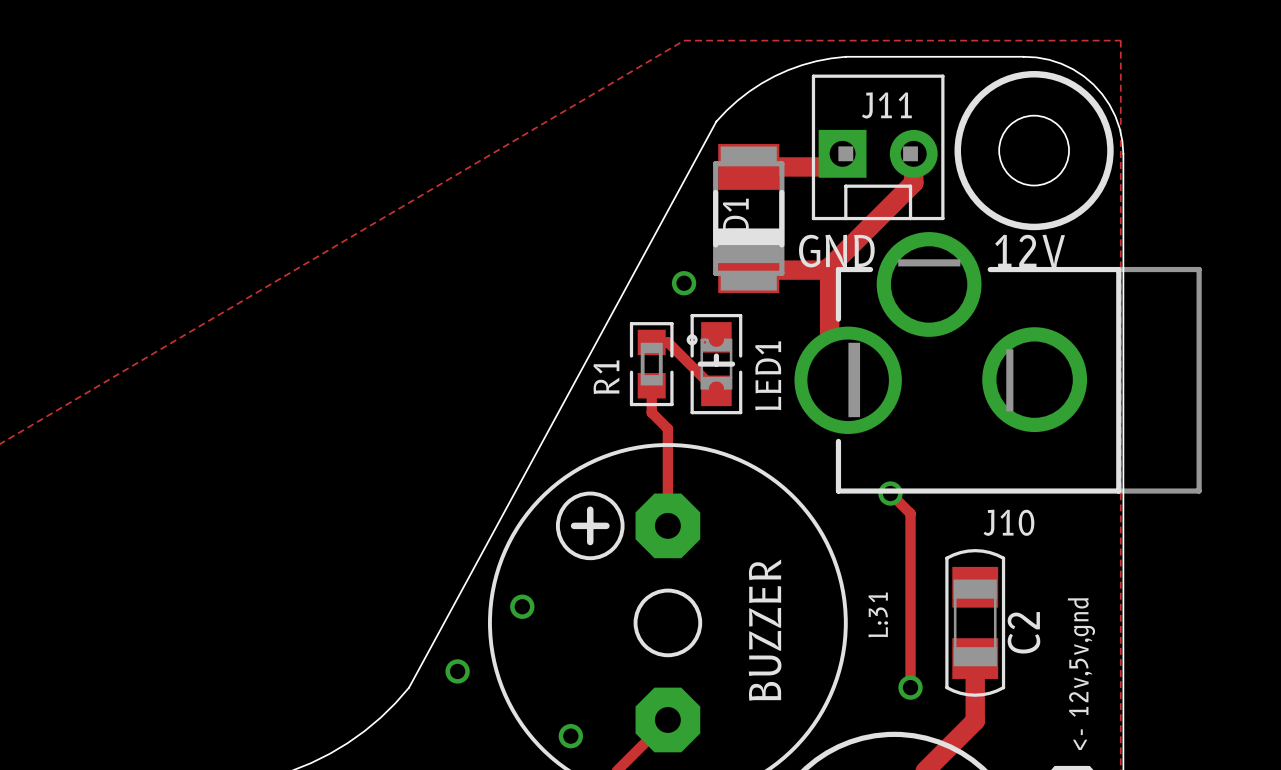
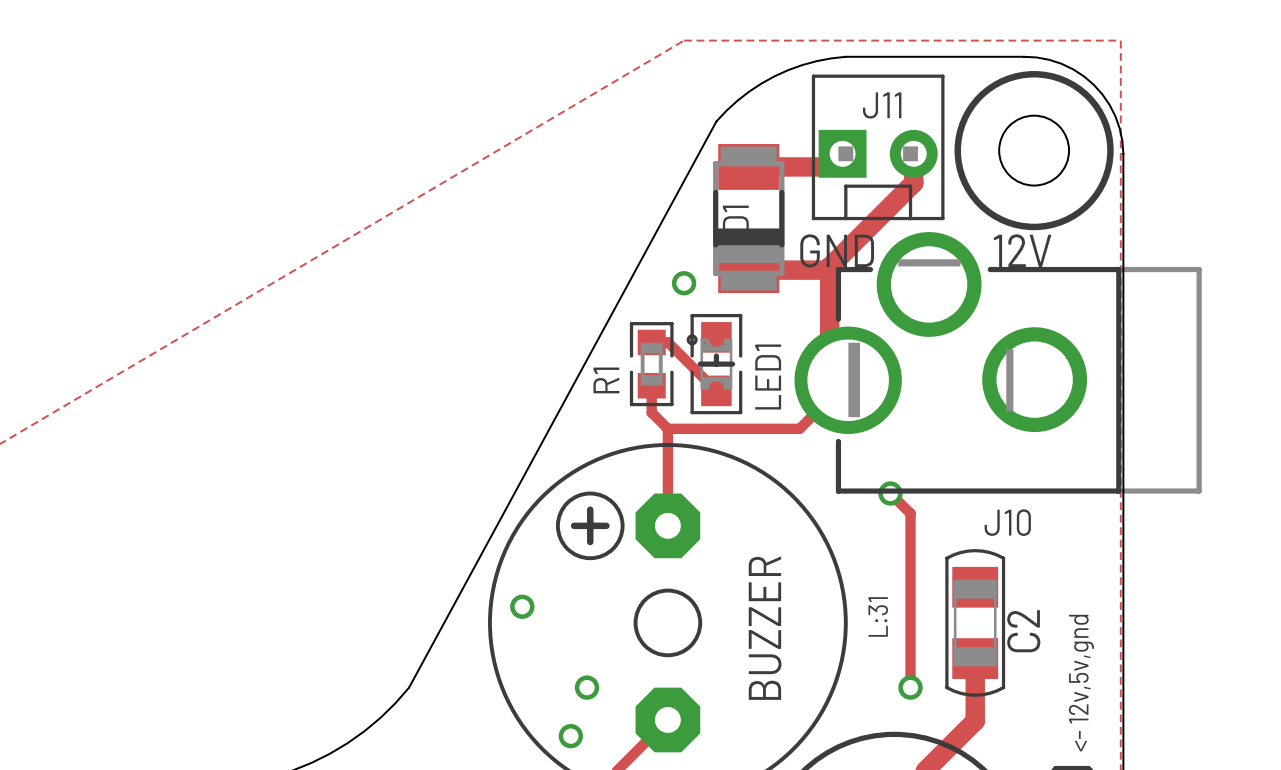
track: none -> (848, 380) (799, 428) (667, 428)
via: (457, 671) -> none
via: none -> (587, 687)

